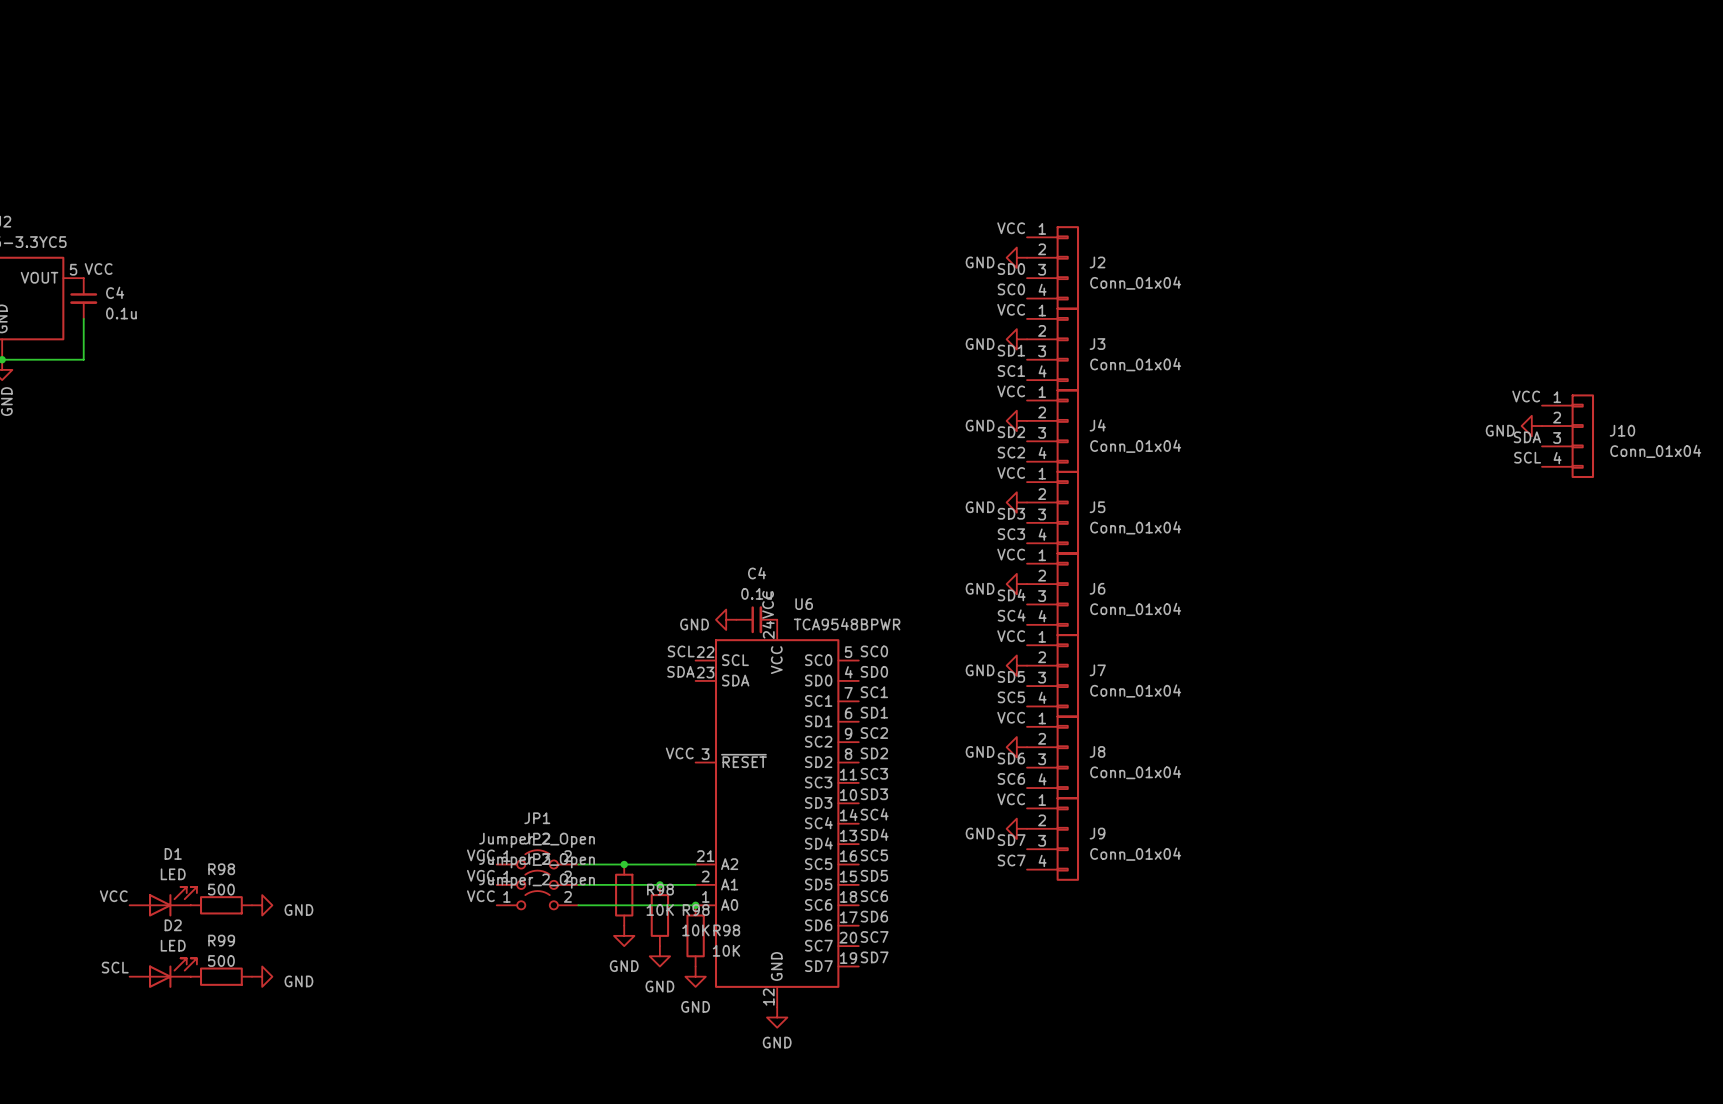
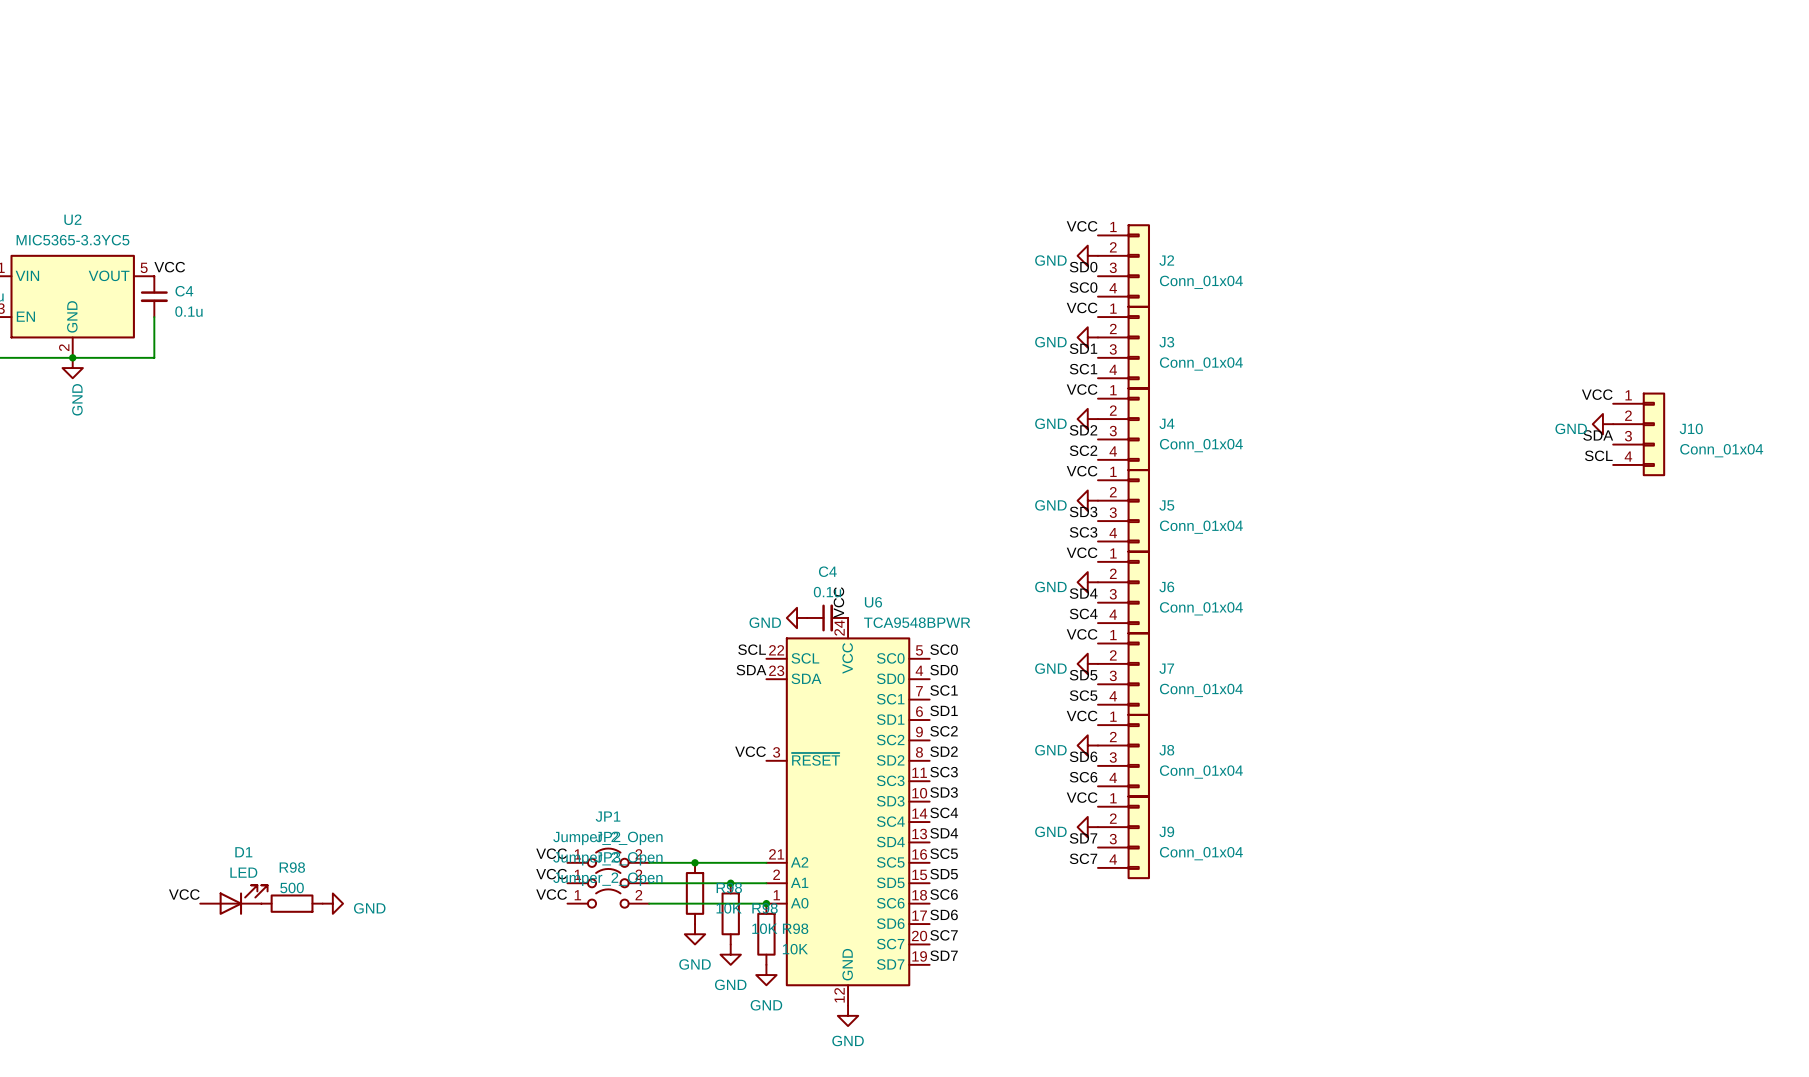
label: SCL (115, 967) -> none
D2: LED (163, 973) -> none
R99: 500 (221, 976) -> none
power symbol: GND (262, 976) -> none

